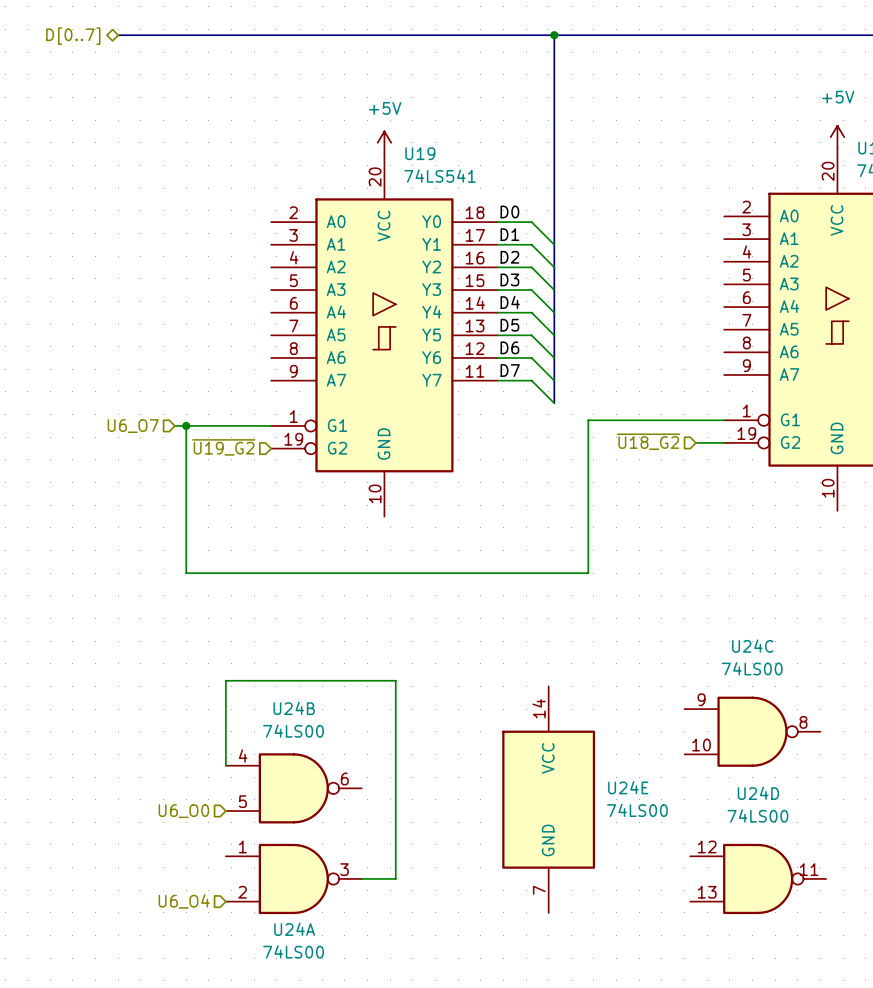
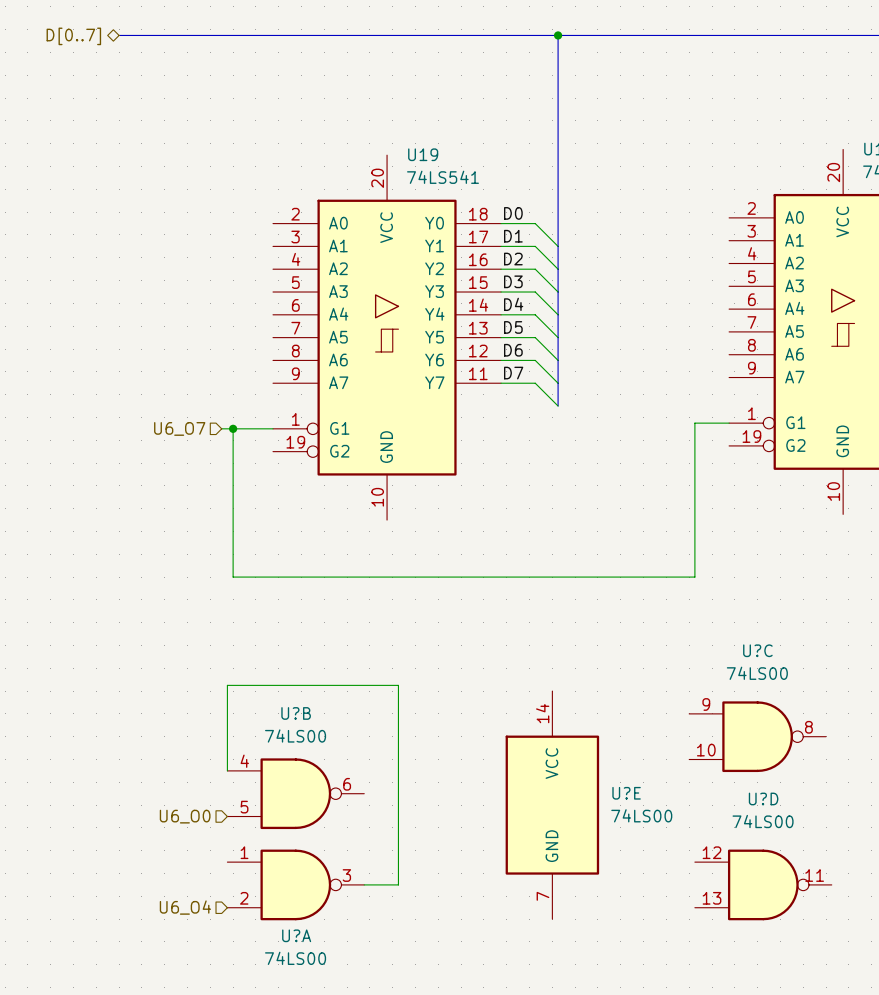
power symbol: +5V (837, 137) -> none
power symbol: +5V (384, 142) -> none
wire: (690, 420) (588, 420) (588, 573) -> (694, 423) (694, 577) (592, 577)
wire: (174, 425) (220, 425) -> none
wire: (186, 425) (186, 573) (231, 573) -> (233, 428) (233, 577)
junction position: (186, 425) -> (233, 428)
hierarchical label position: U6_O7 (133, 426) -> U6_O7 (179, 428)
hierarchical label: ~{U18_G2} (648, 441) -> none
wire: (695, 442) (724, 442) -> none
hierarchical label: ~{U19_G2} (223, 447) -> none
U24C name: U24C (752, 646) -> U?C (757, 650)
U24B name: U24B (294, 708) -> U?B (296, 713)
U24E name: U24E (628, 787) -> U?E (626, 793)
U24D name: U24D (758, 793) -> U?D (763, 798)
U24A name: U24A (294, 929) -> U?A (296, 935)

